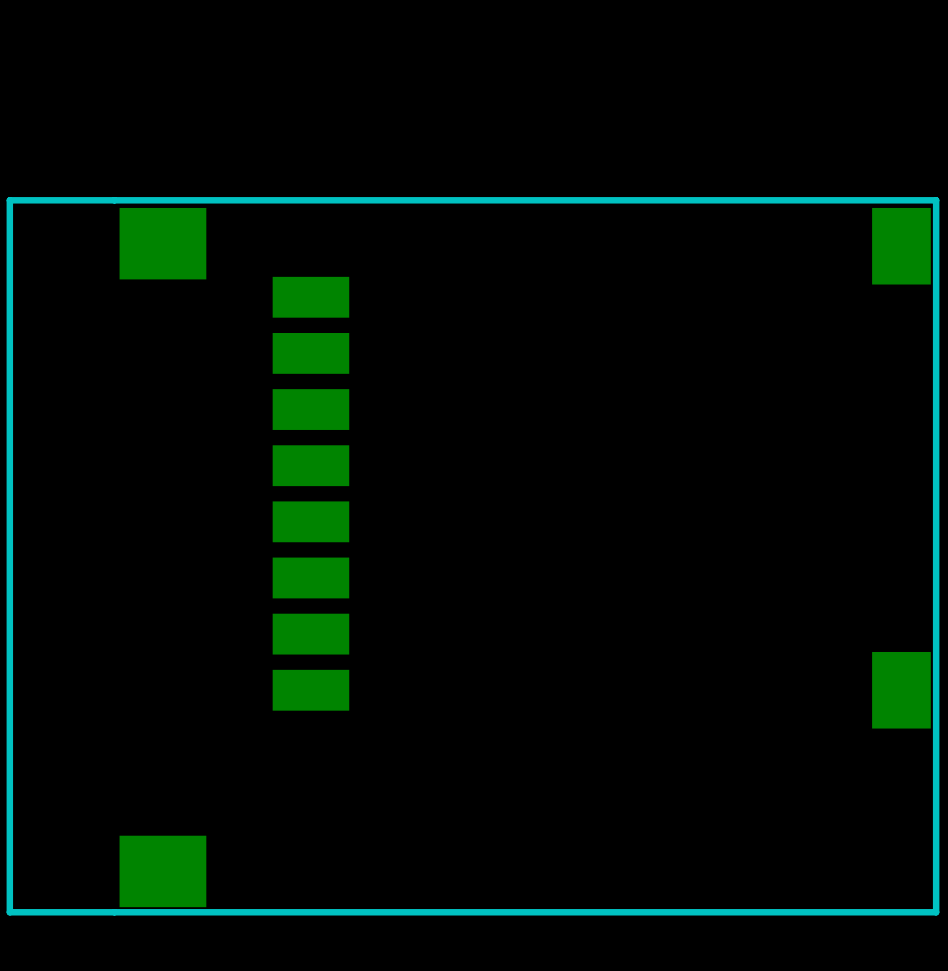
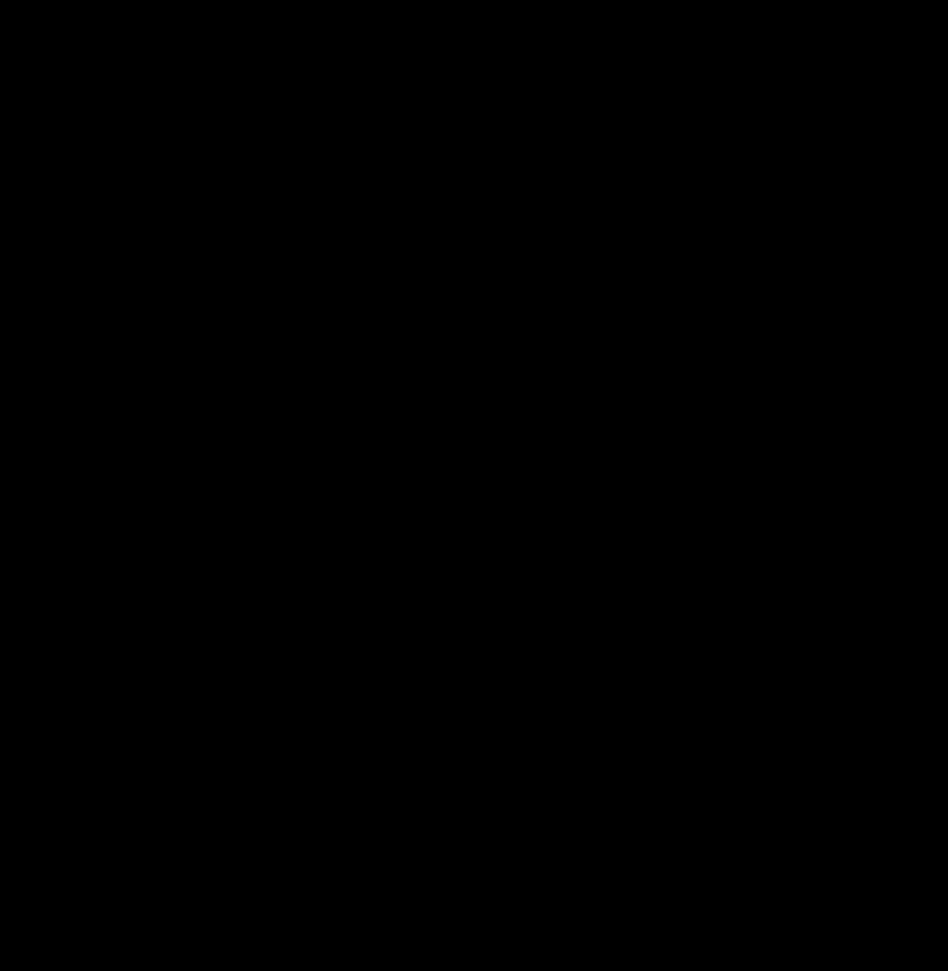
part: (472, 556) -> none

